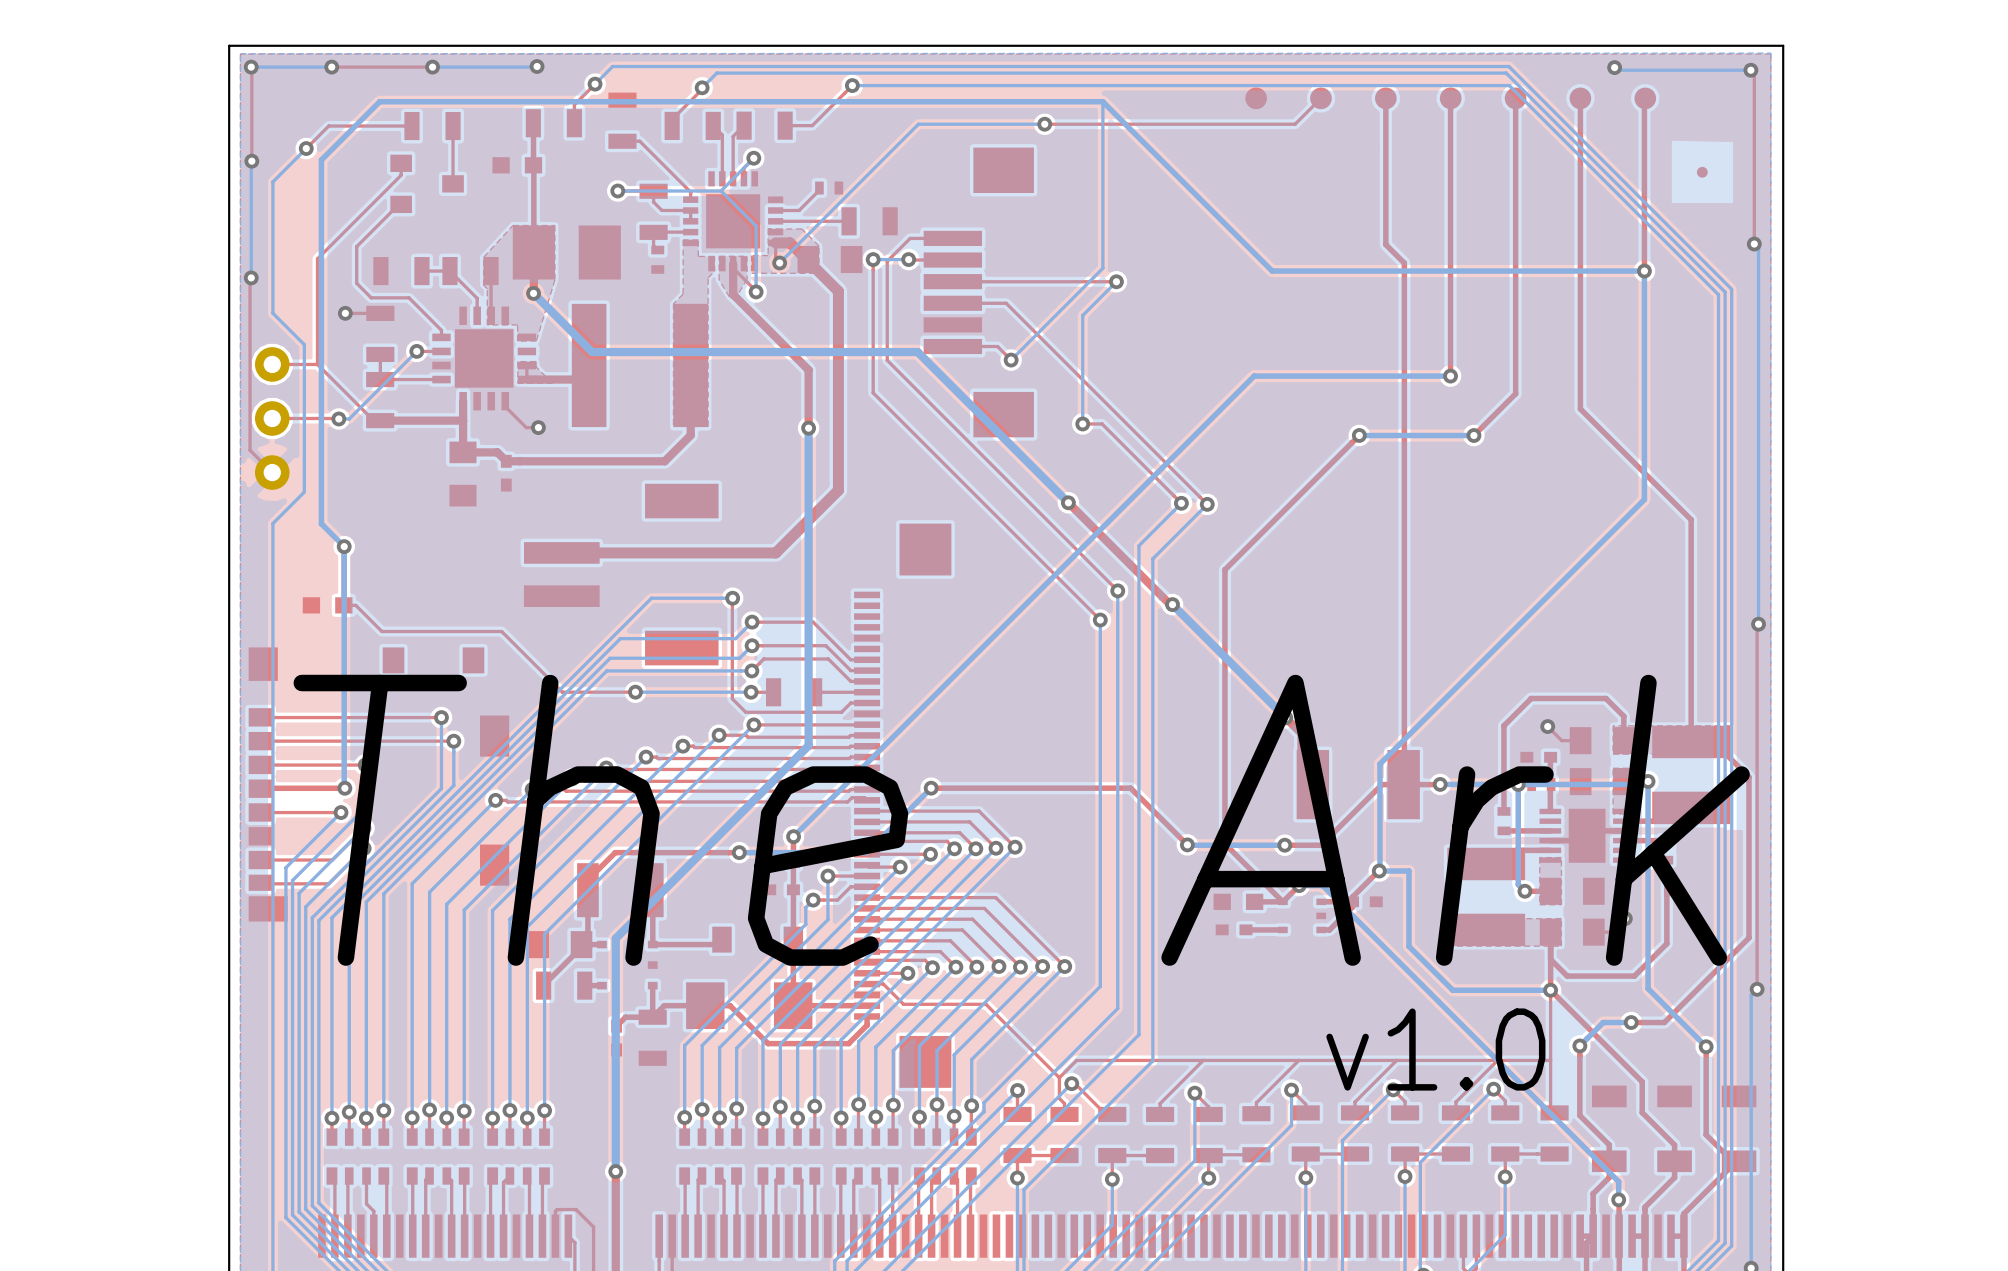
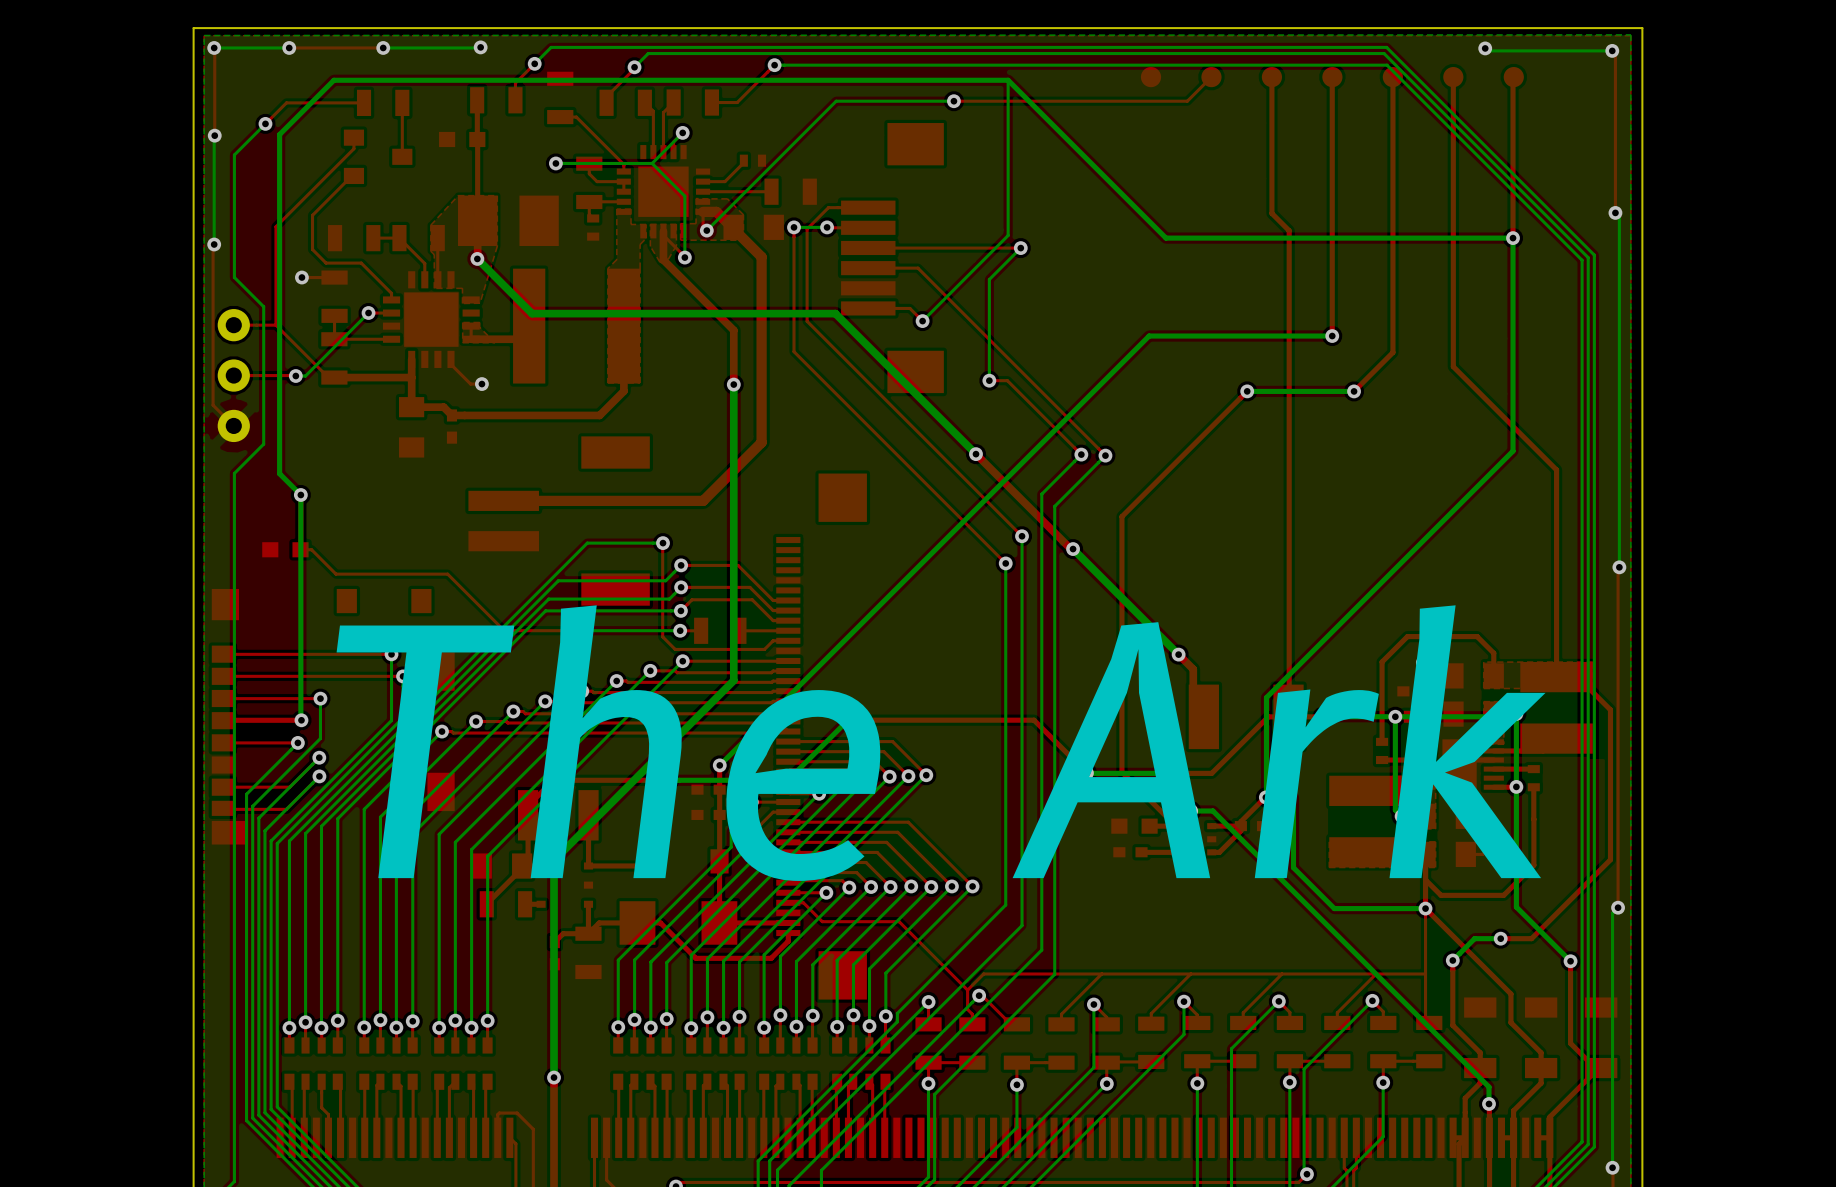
part: (1702, 172) -> none
text: v1.0 (1435, 1049) -> none

